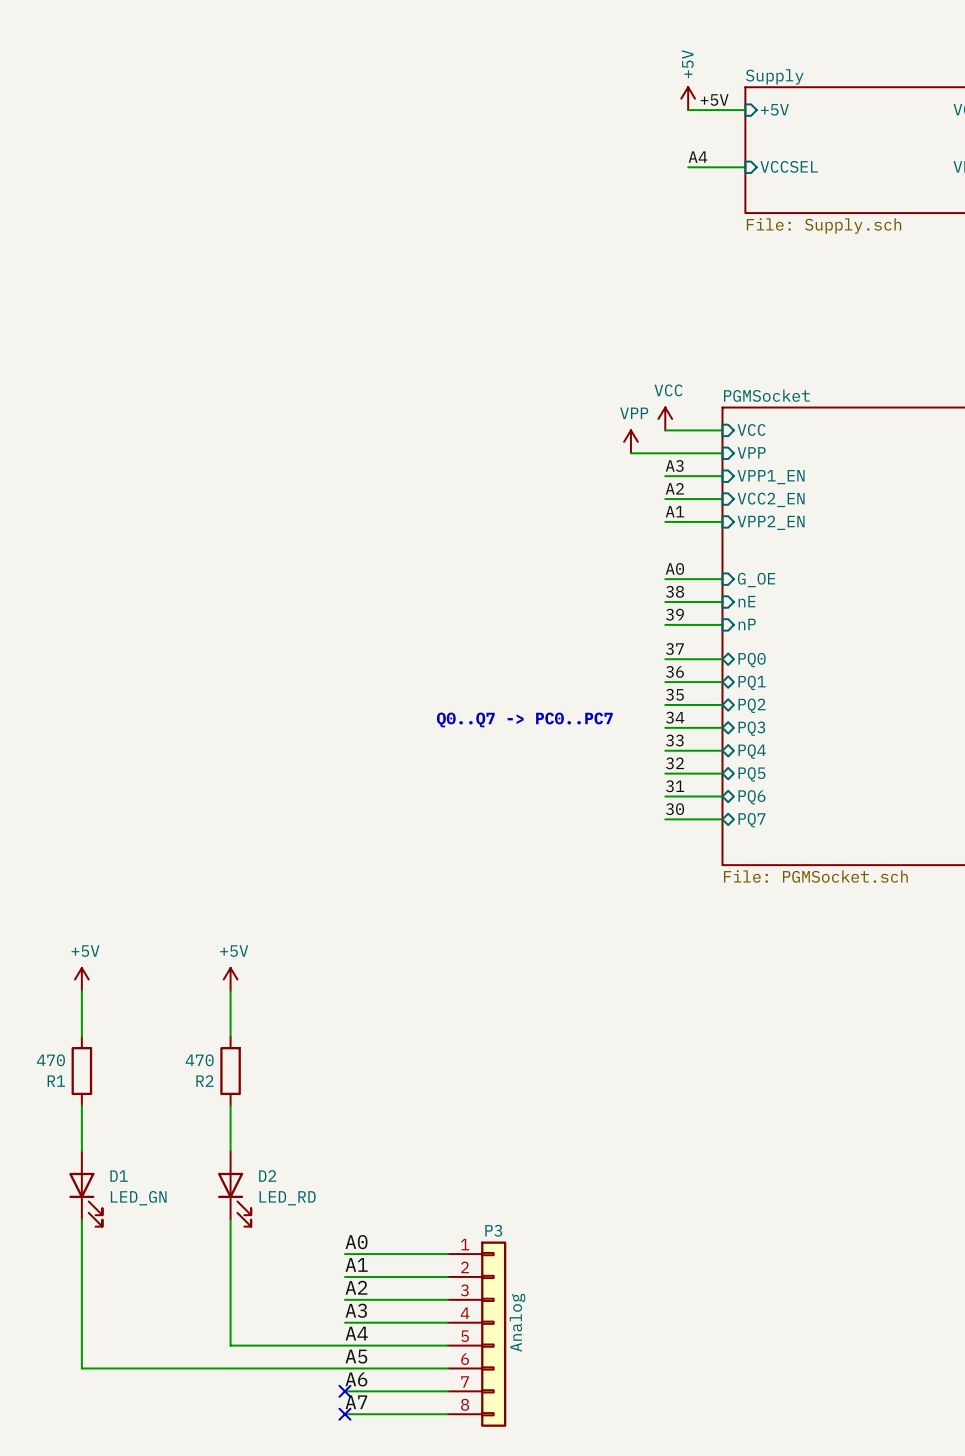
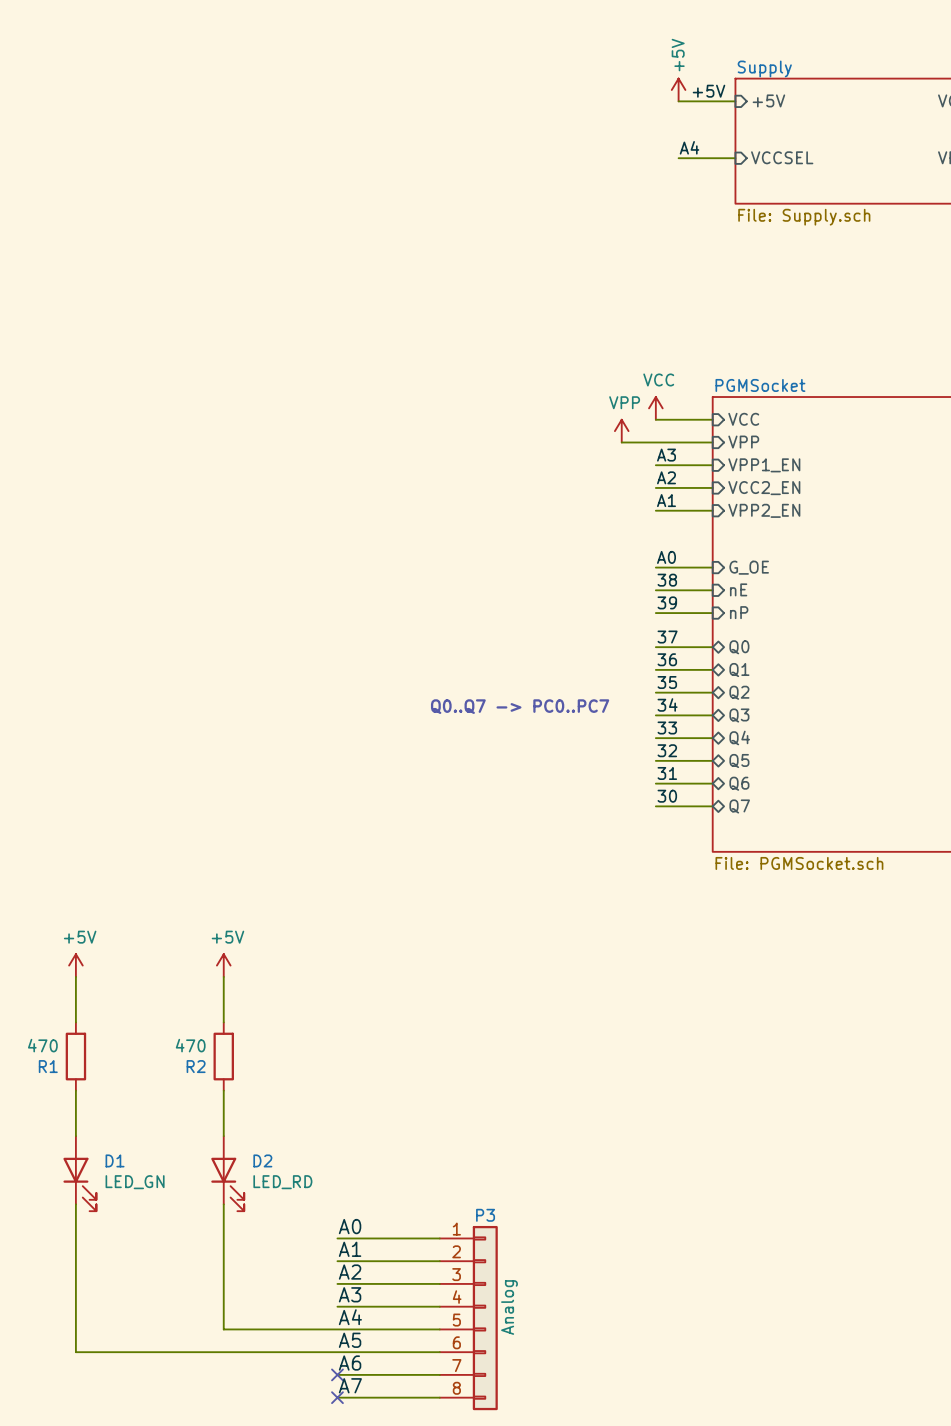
sheet pin: PQ0 (752, 660) -> Q0 (739, 647)
sheet pin: PQ1 (752, 682) -> Q1 (739, 670)
sheet pin: PQ2 (751, 705) -> Q2 (739, 692)
sheet pin: PQ3 (751, 728) -> Q3 (739, 715)
sheet pin: PQ4 (752, 751) -> Q4 (739, 737)
sheet pin: PQ5 (751, 774) -> Q5 (739, 761)
sheet pin: PQ6 (751, 797) -> Q6 (739, 783)
sheet pin: PQ7 (751, 820) -> Q7 (739, 806)

